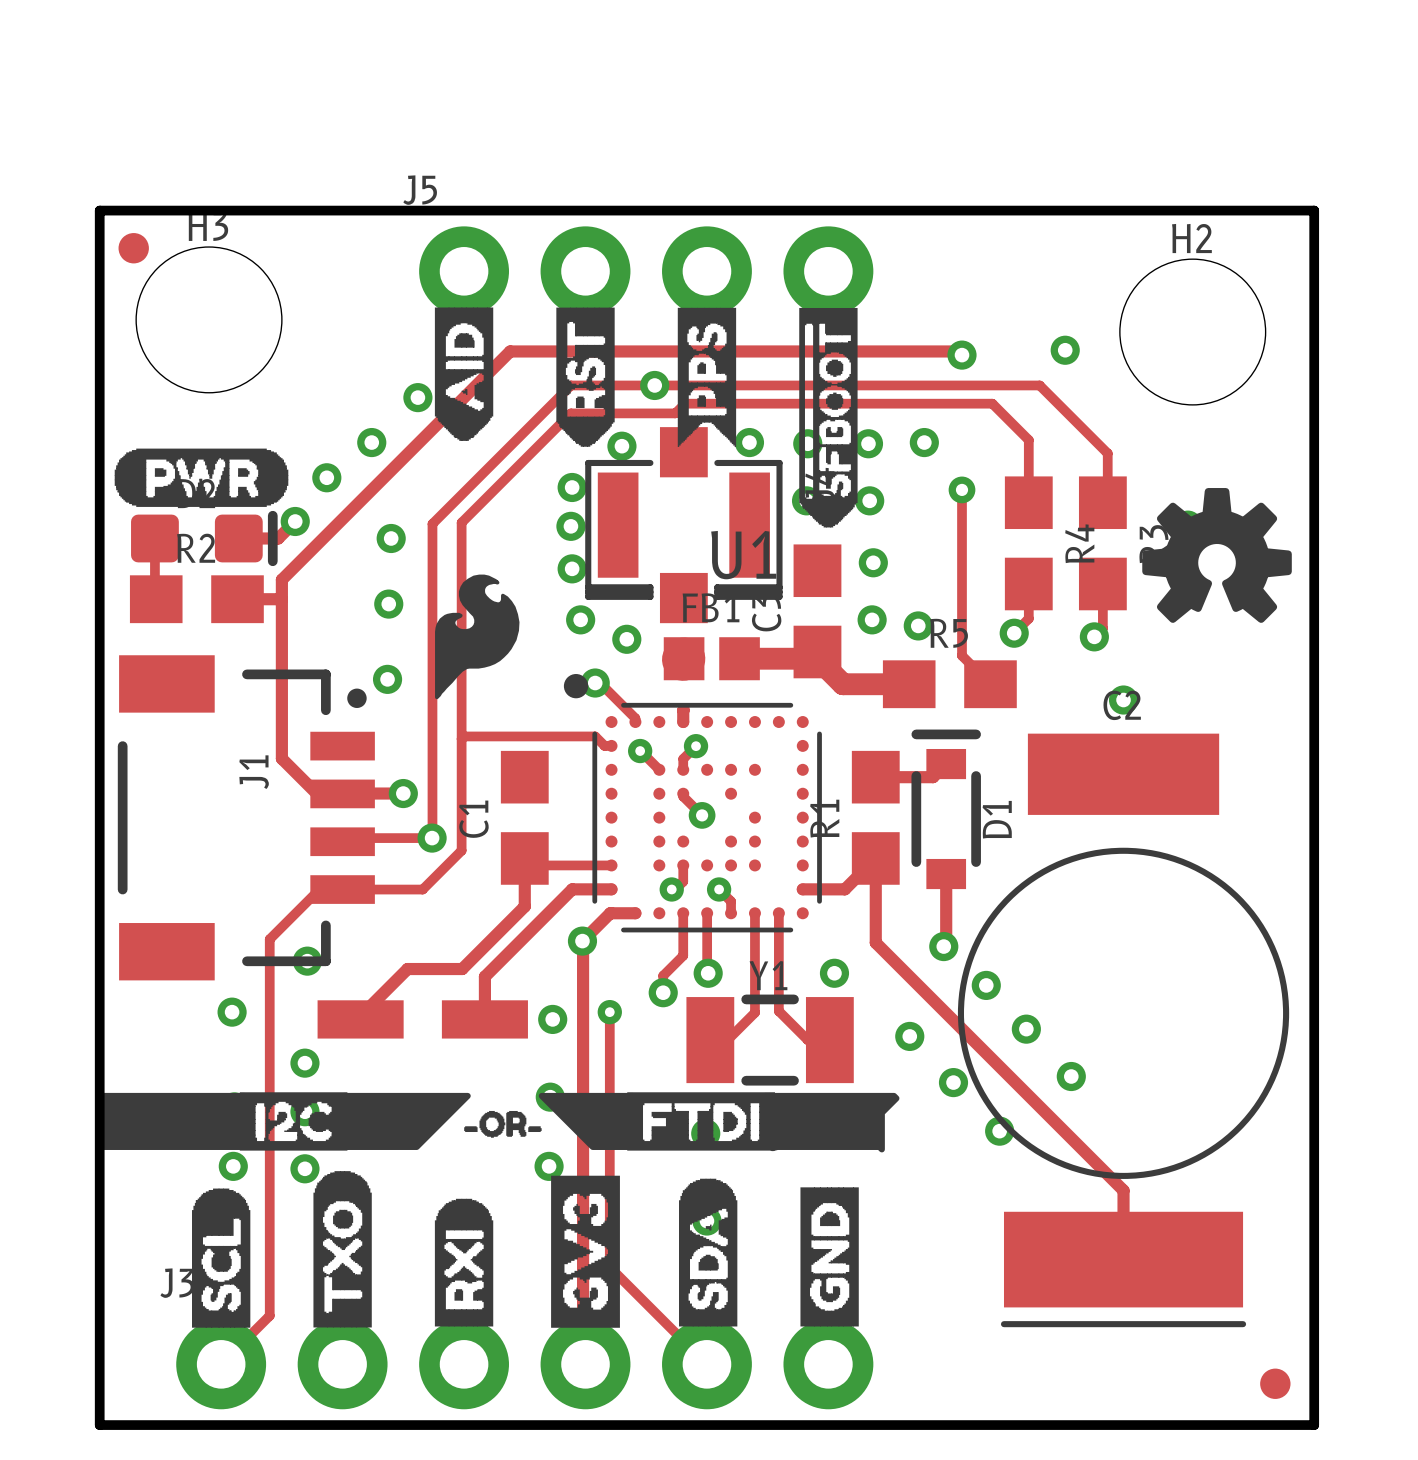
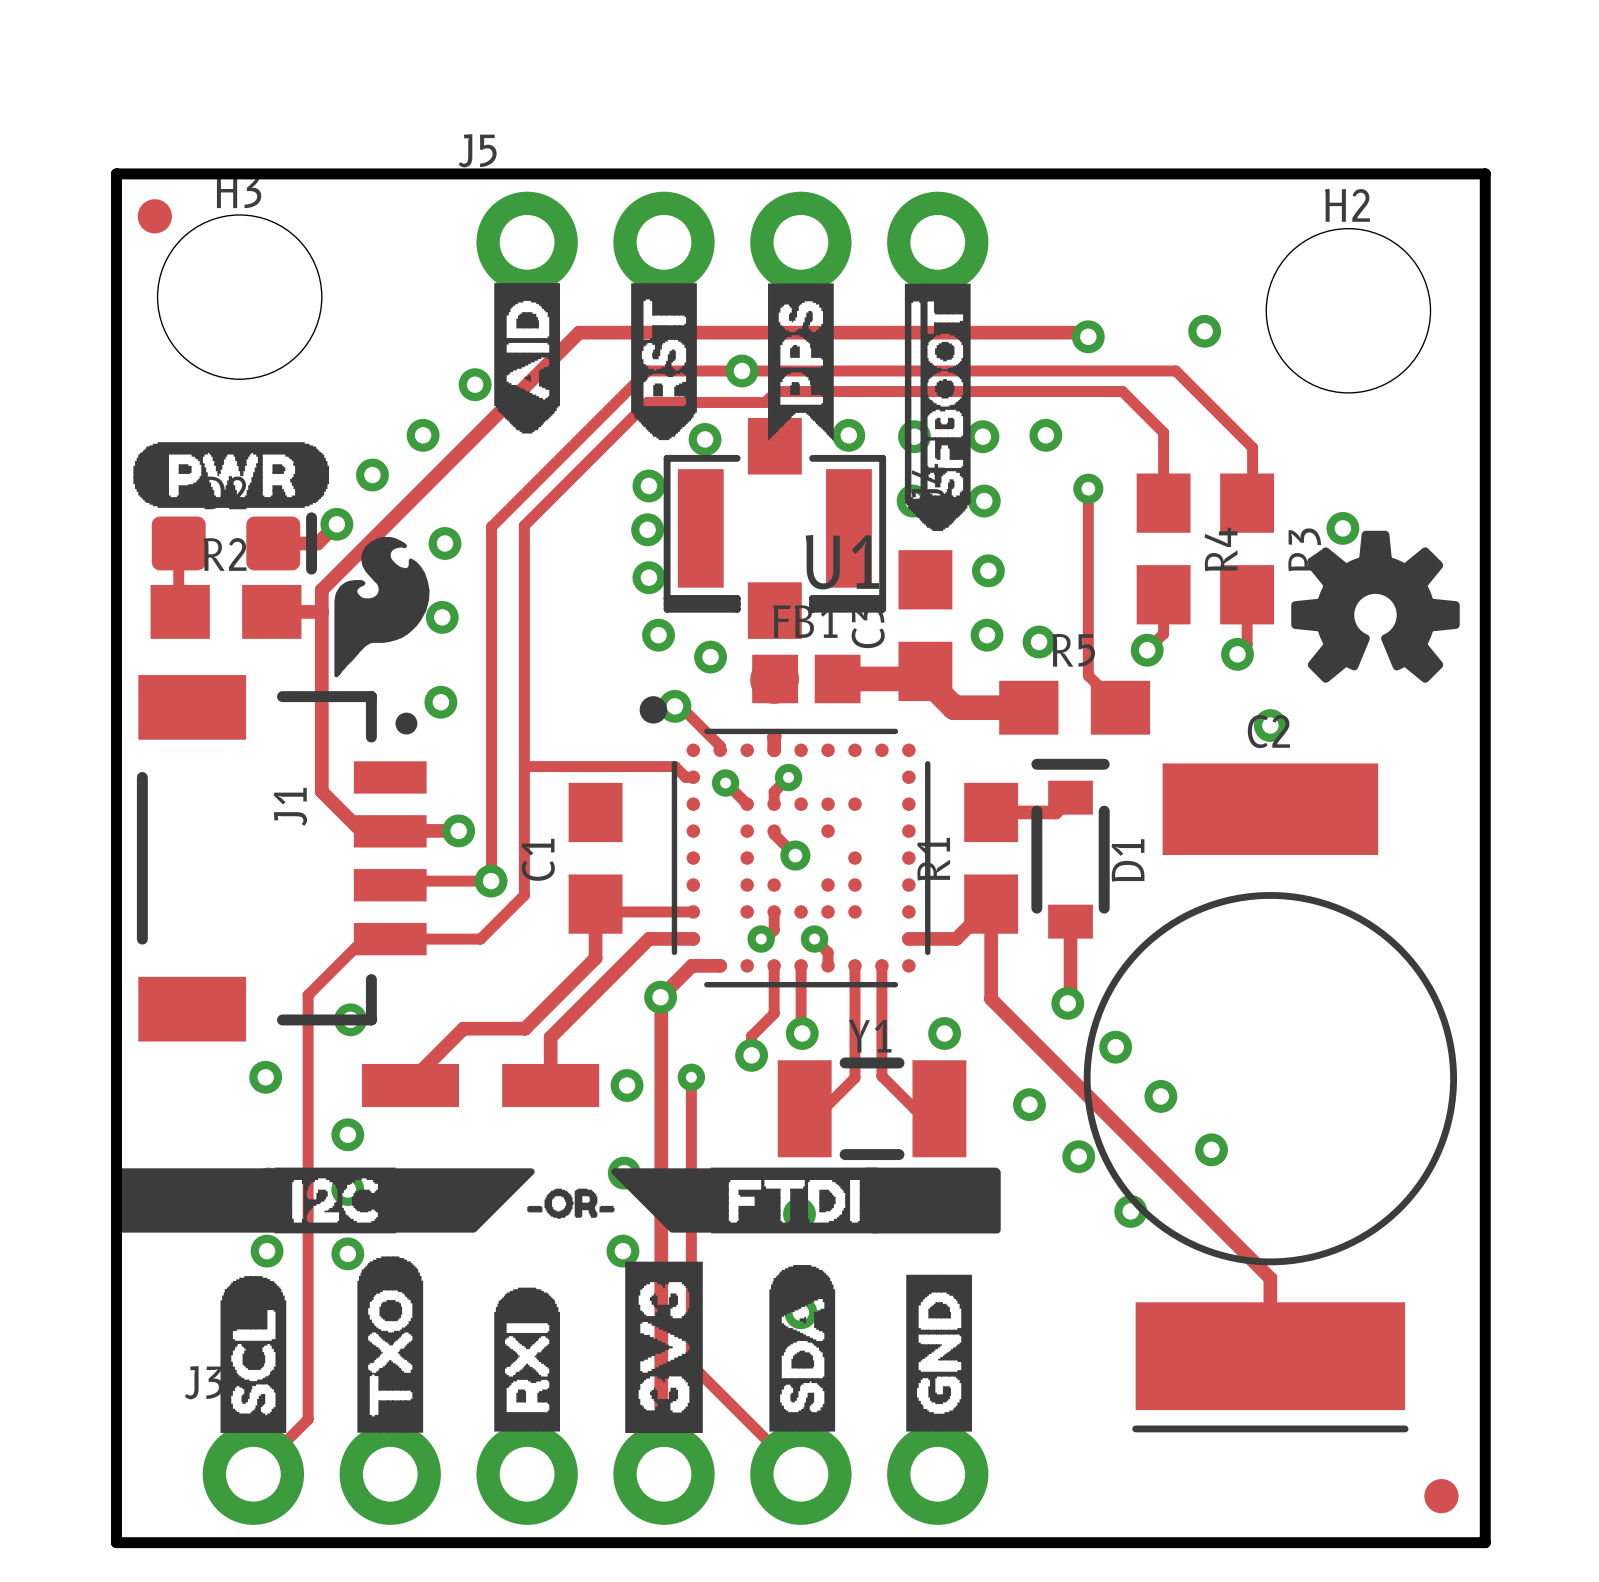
drawing position: (1217, 555) -> (1375, 606)
drawing position: (477, 636) -> (381, 607)
drawing shape: [762, 1092, 900, 1153] -> [863, 1167, 1001, 1234]

